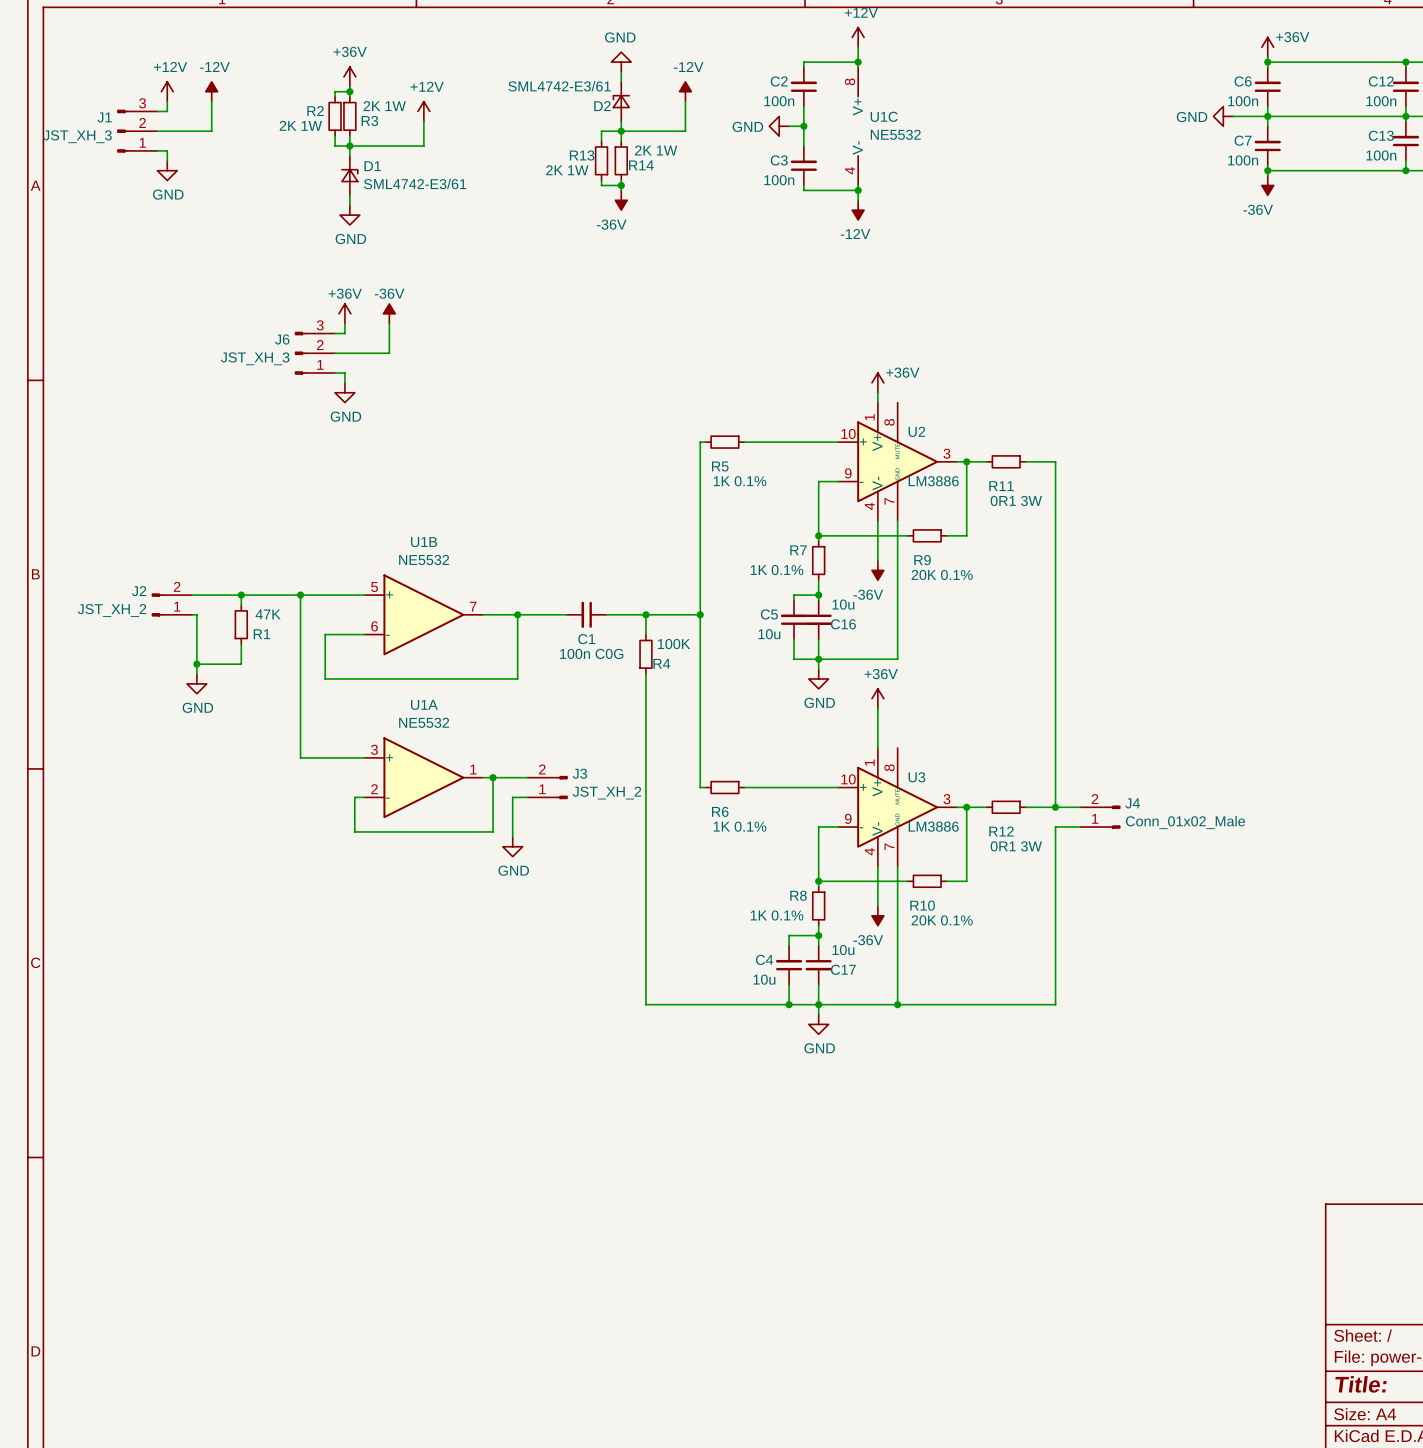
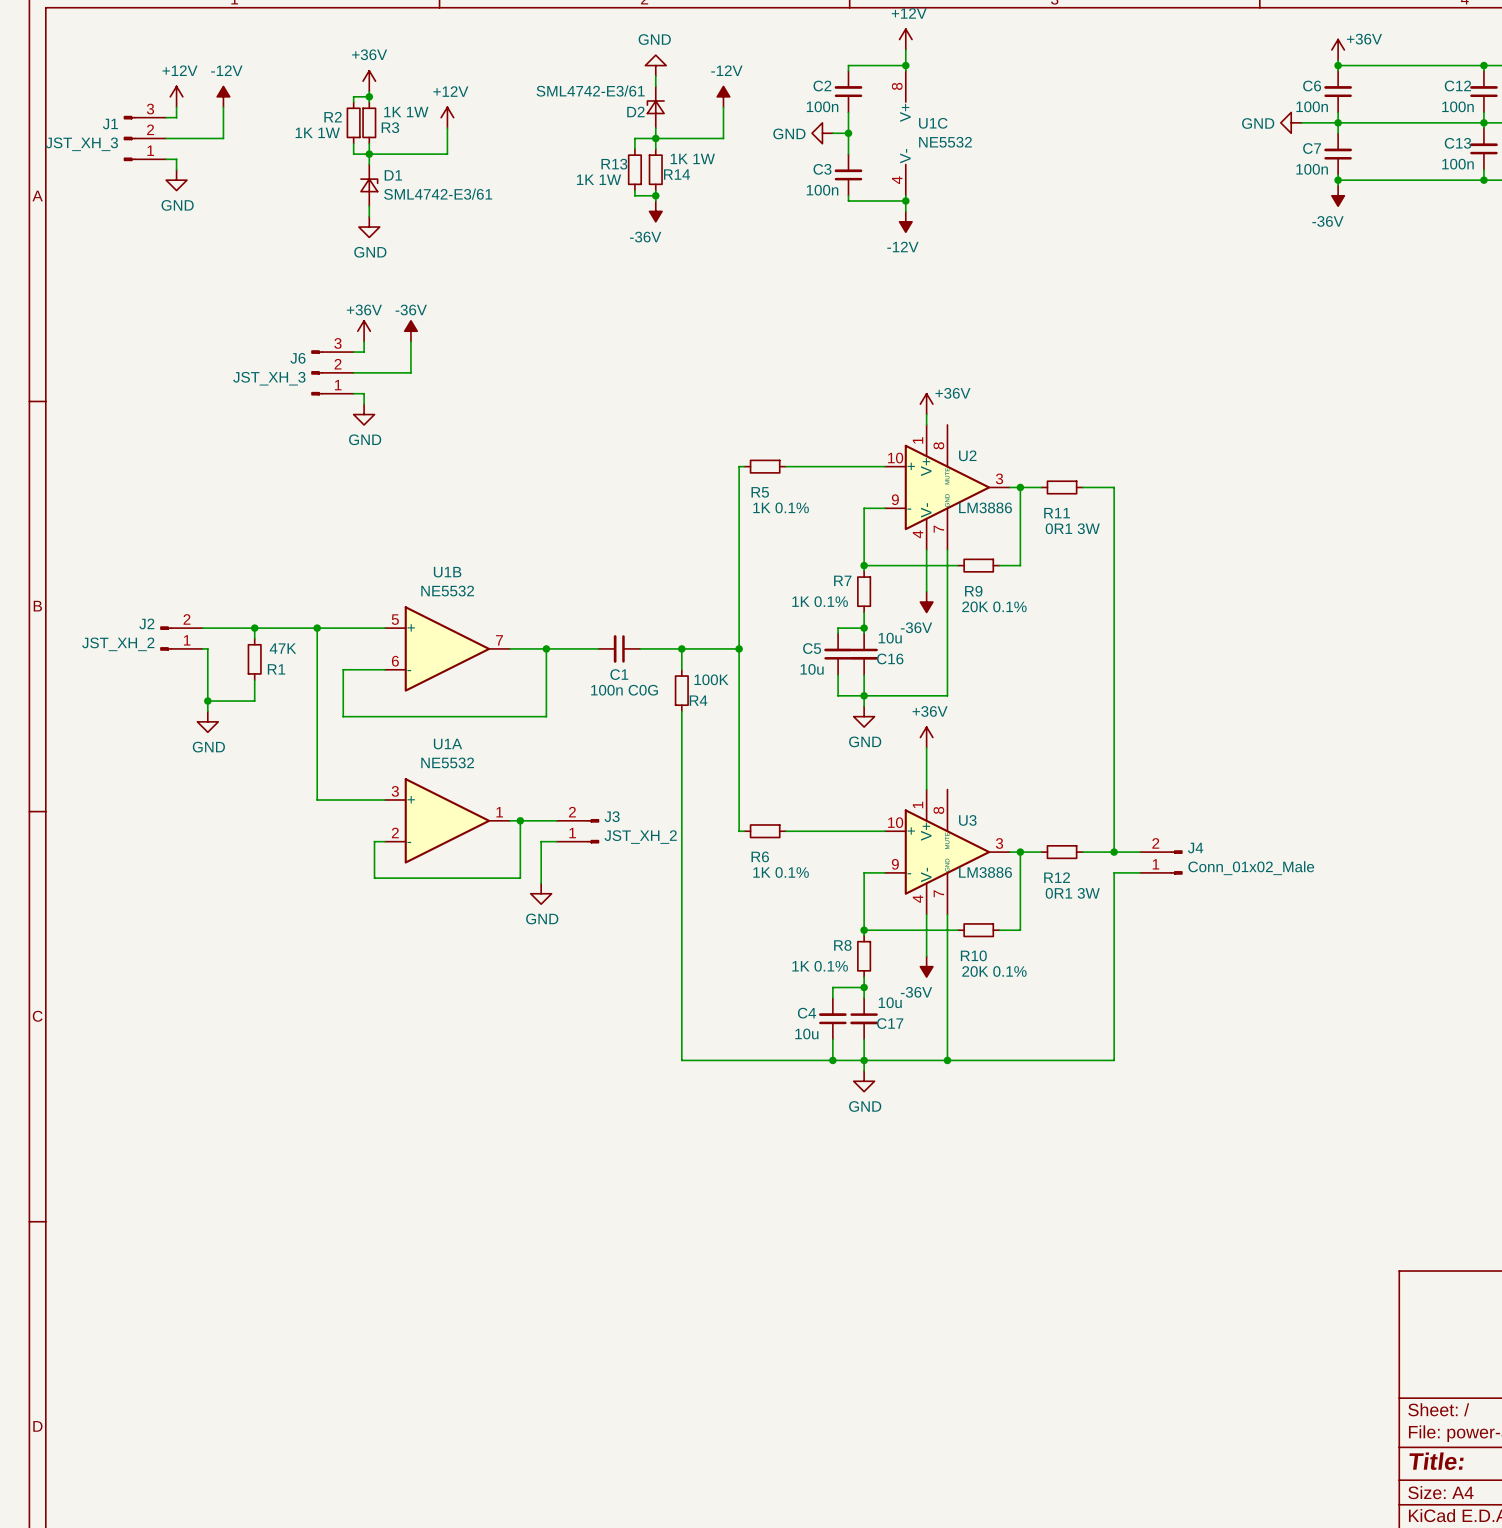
R3 value: 2K 1W (384, 106) -> 1K 1W (406, 112)
R2 value: 2K 1W (300, 125) -> 1K 1W (317, 132)
R14 value: 2K 1W (656, 150) -> 1K 1W (692, 158)
R13 value: 2K 1W (567, 170) -> 1K 1W (599, 179)

